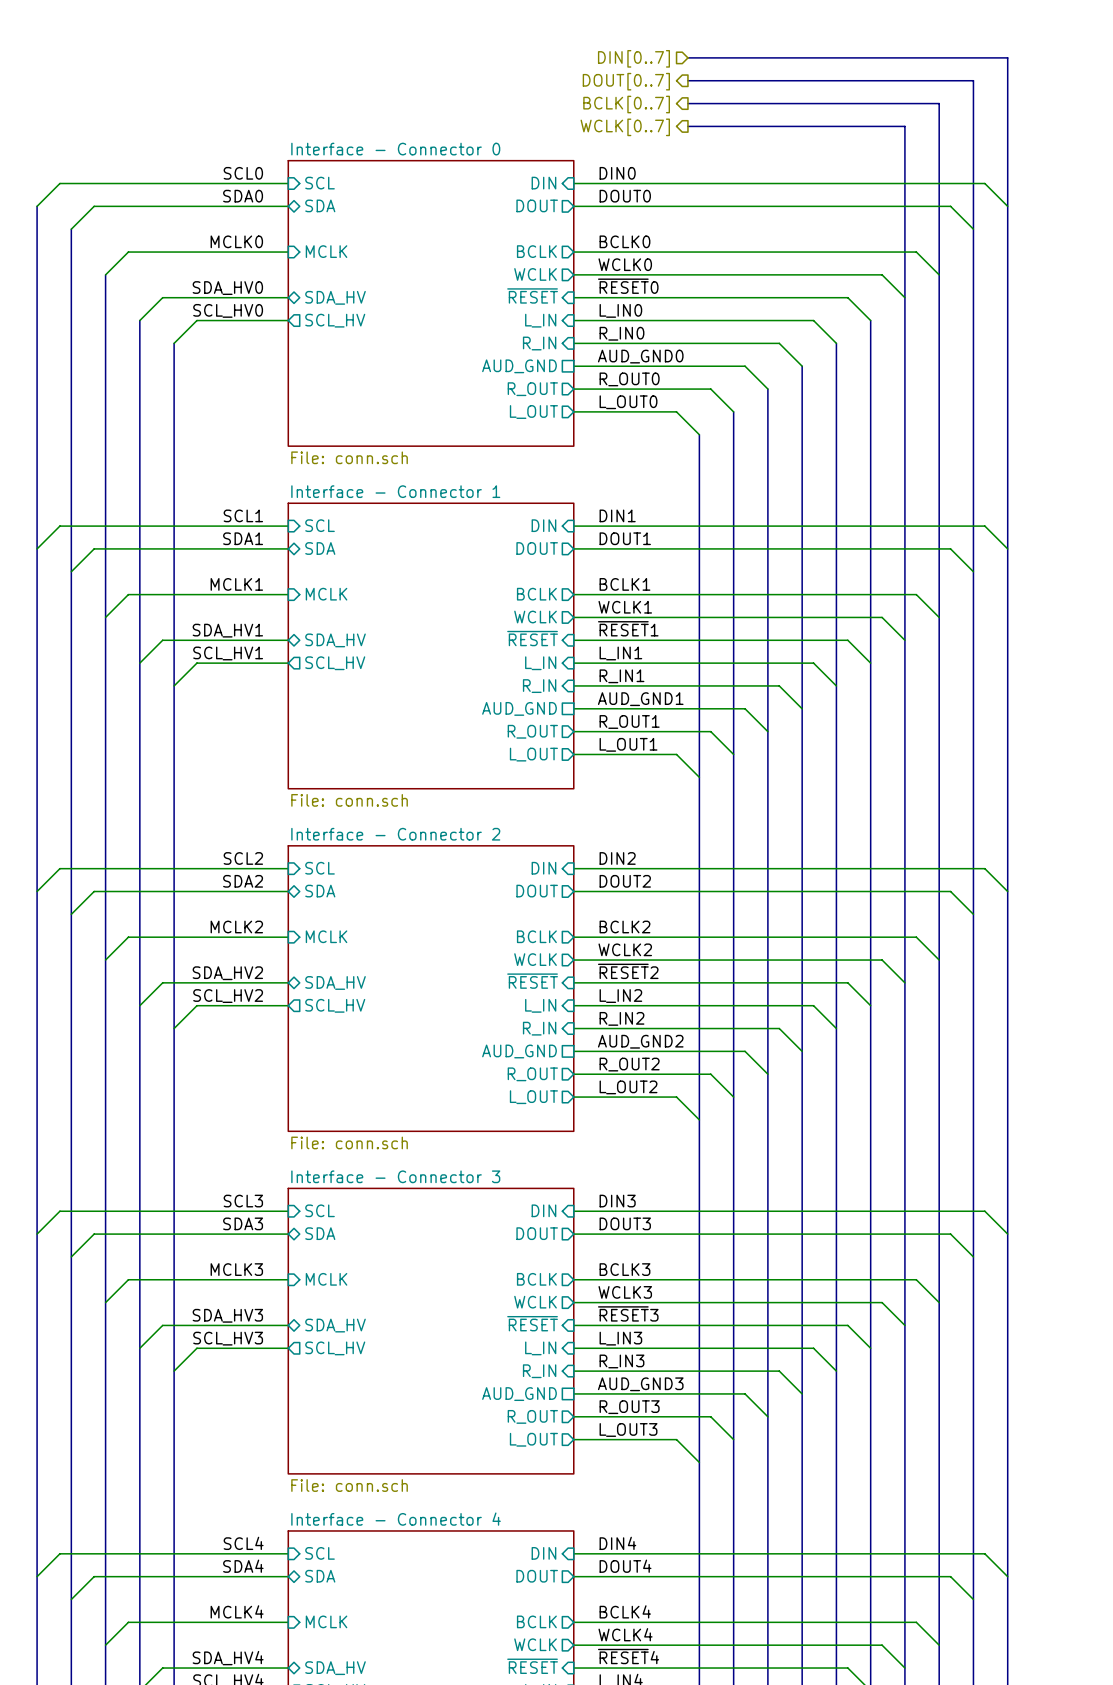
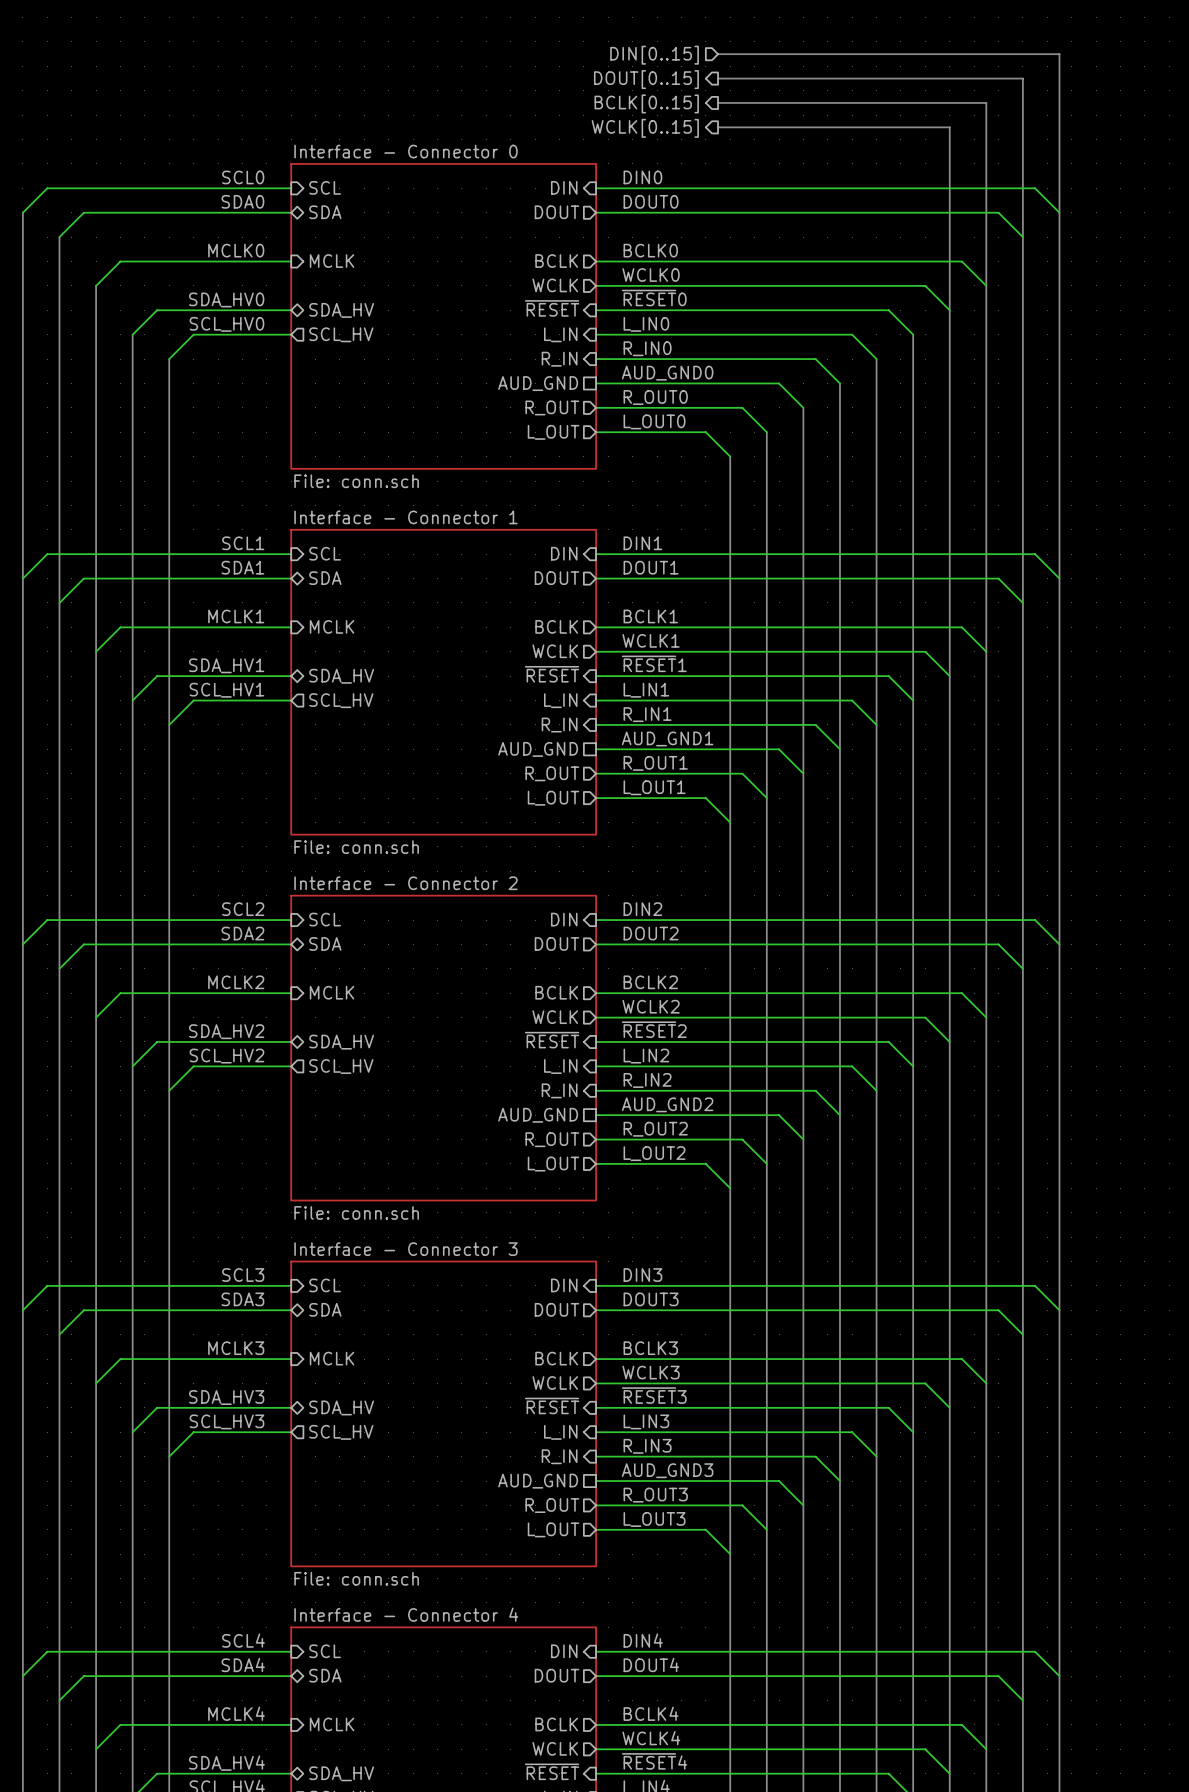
hierarchical label: DIN[0..7] (633, 58) -> DIN[0..15] (654, 55)
hierarchical label: DOUT[0..7] (626, 81) -> DOUT[0..15] (646, 79)
hierarchical label: BCLK[0..7] (626, 104) -> BCLK[0..15] (646, 103)
hierarchical label: WCLK[0..7] (625, 127) -> WCLK[0..15] (645, 128)

